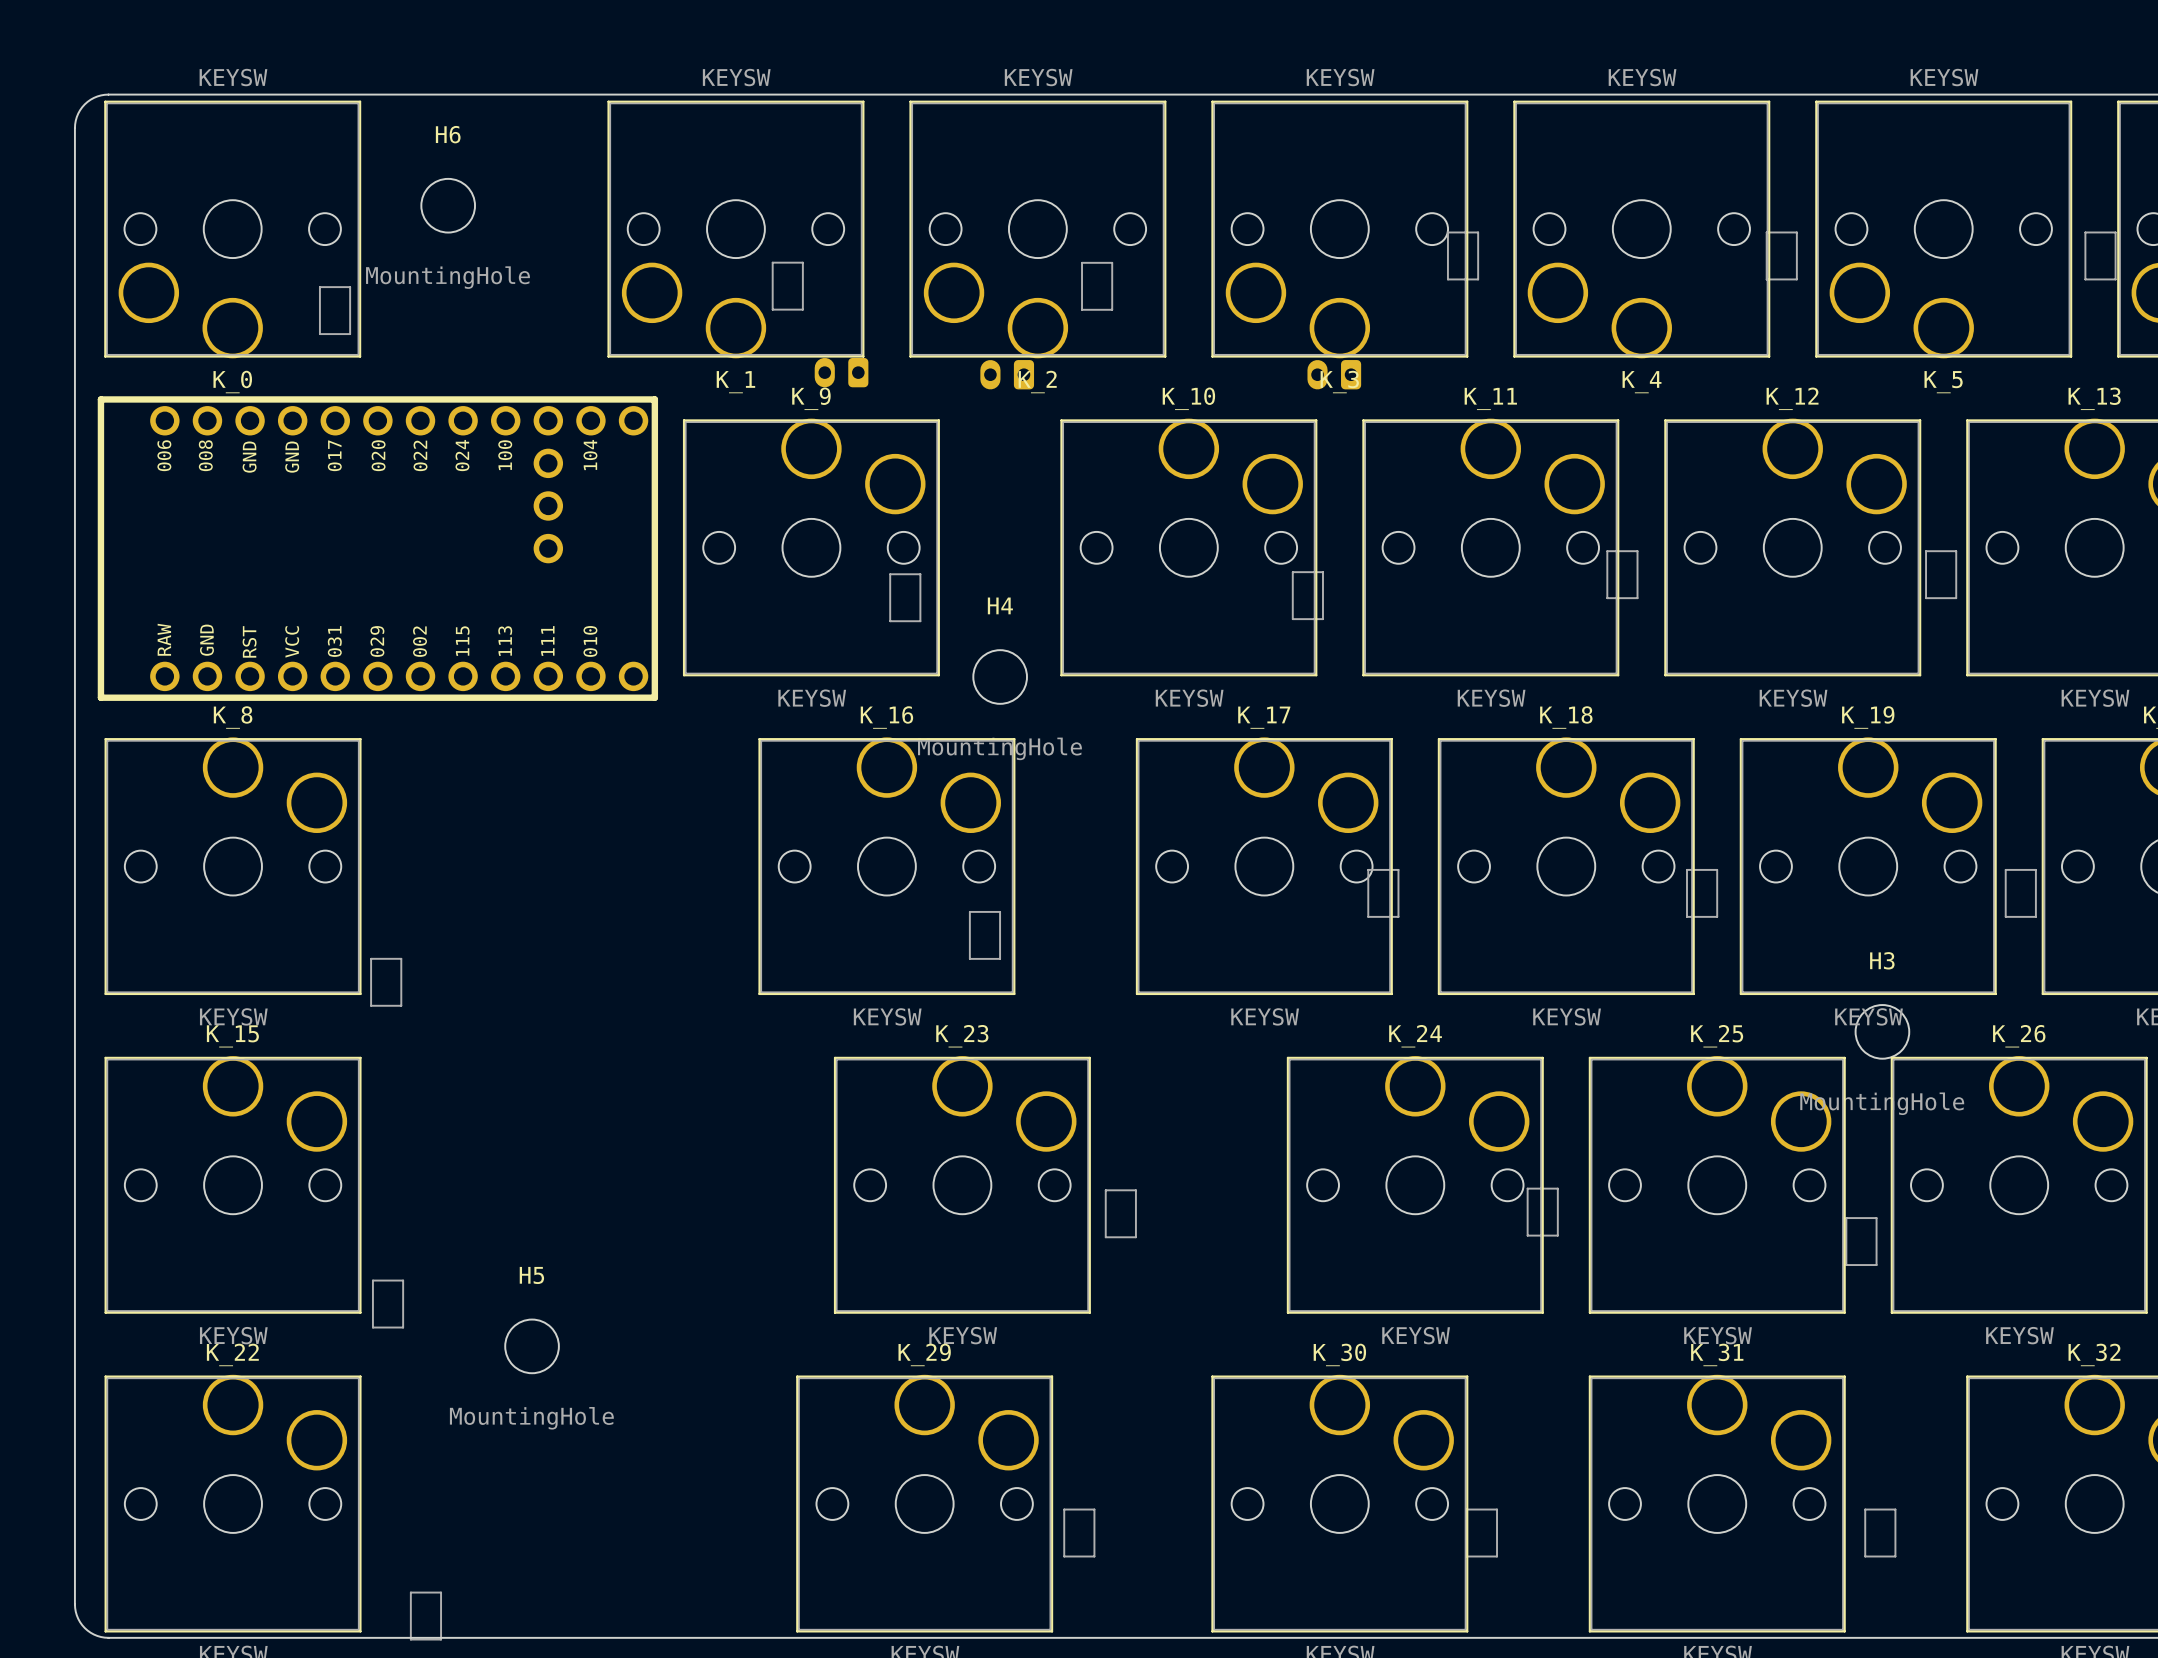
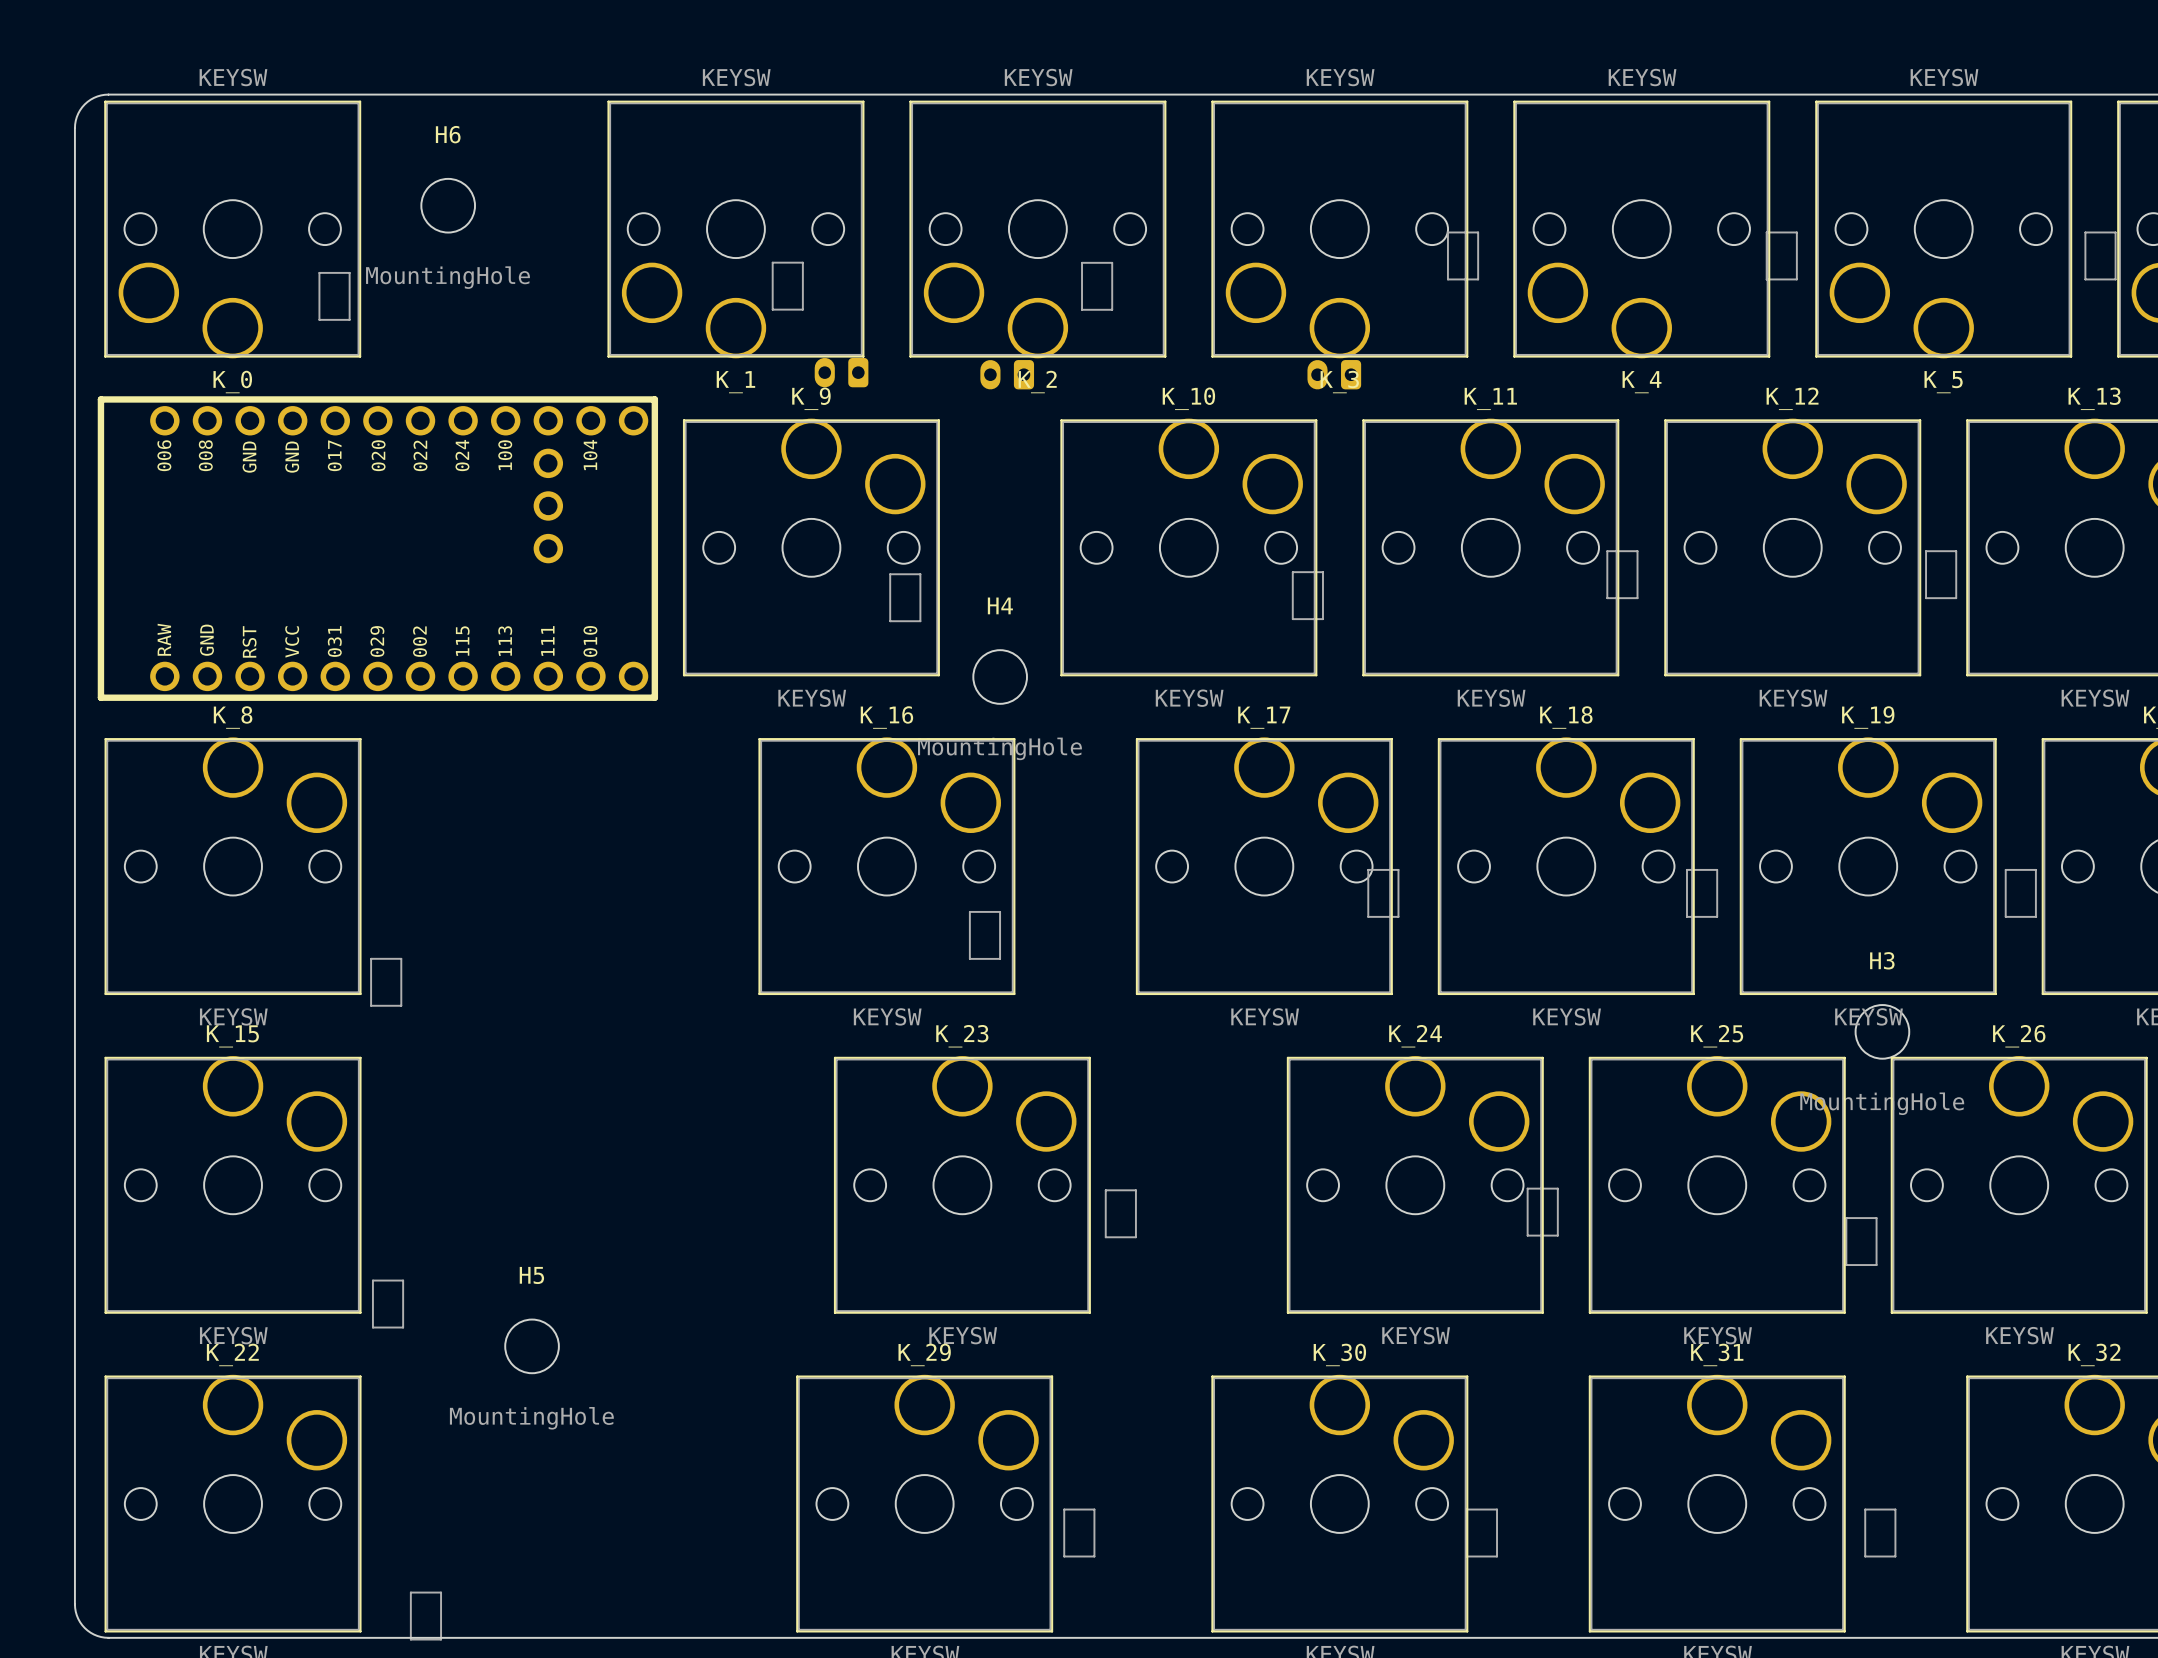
part position: (335, 310) -> (334, 296)

